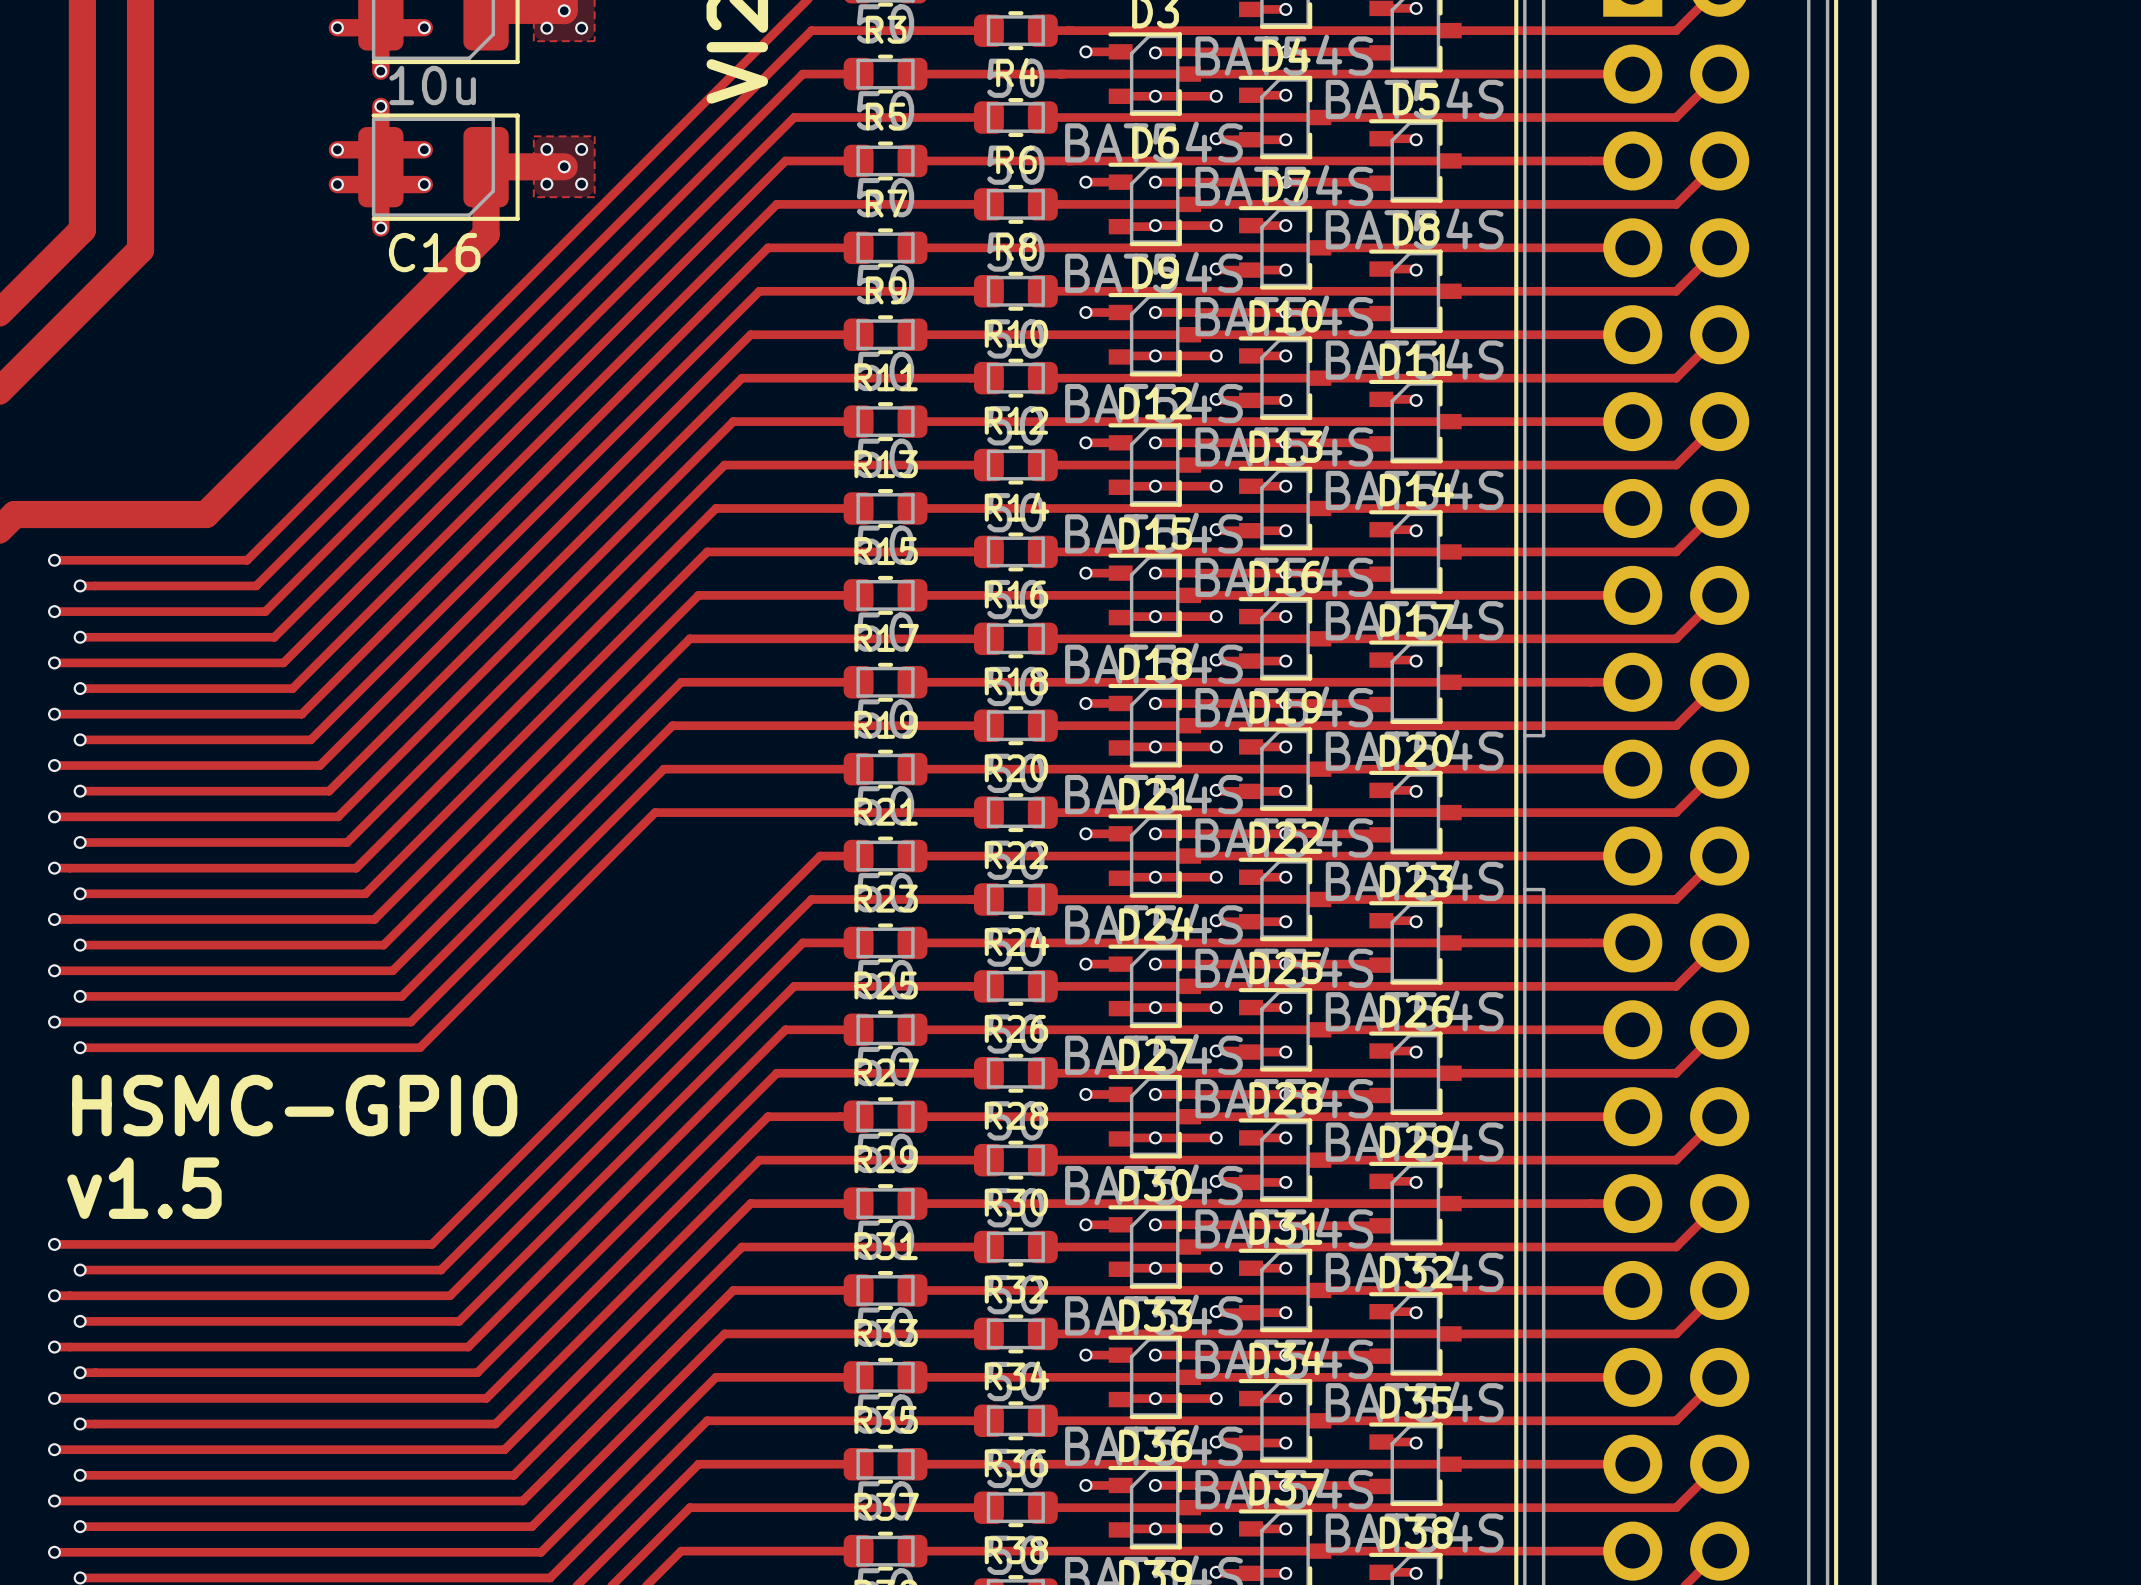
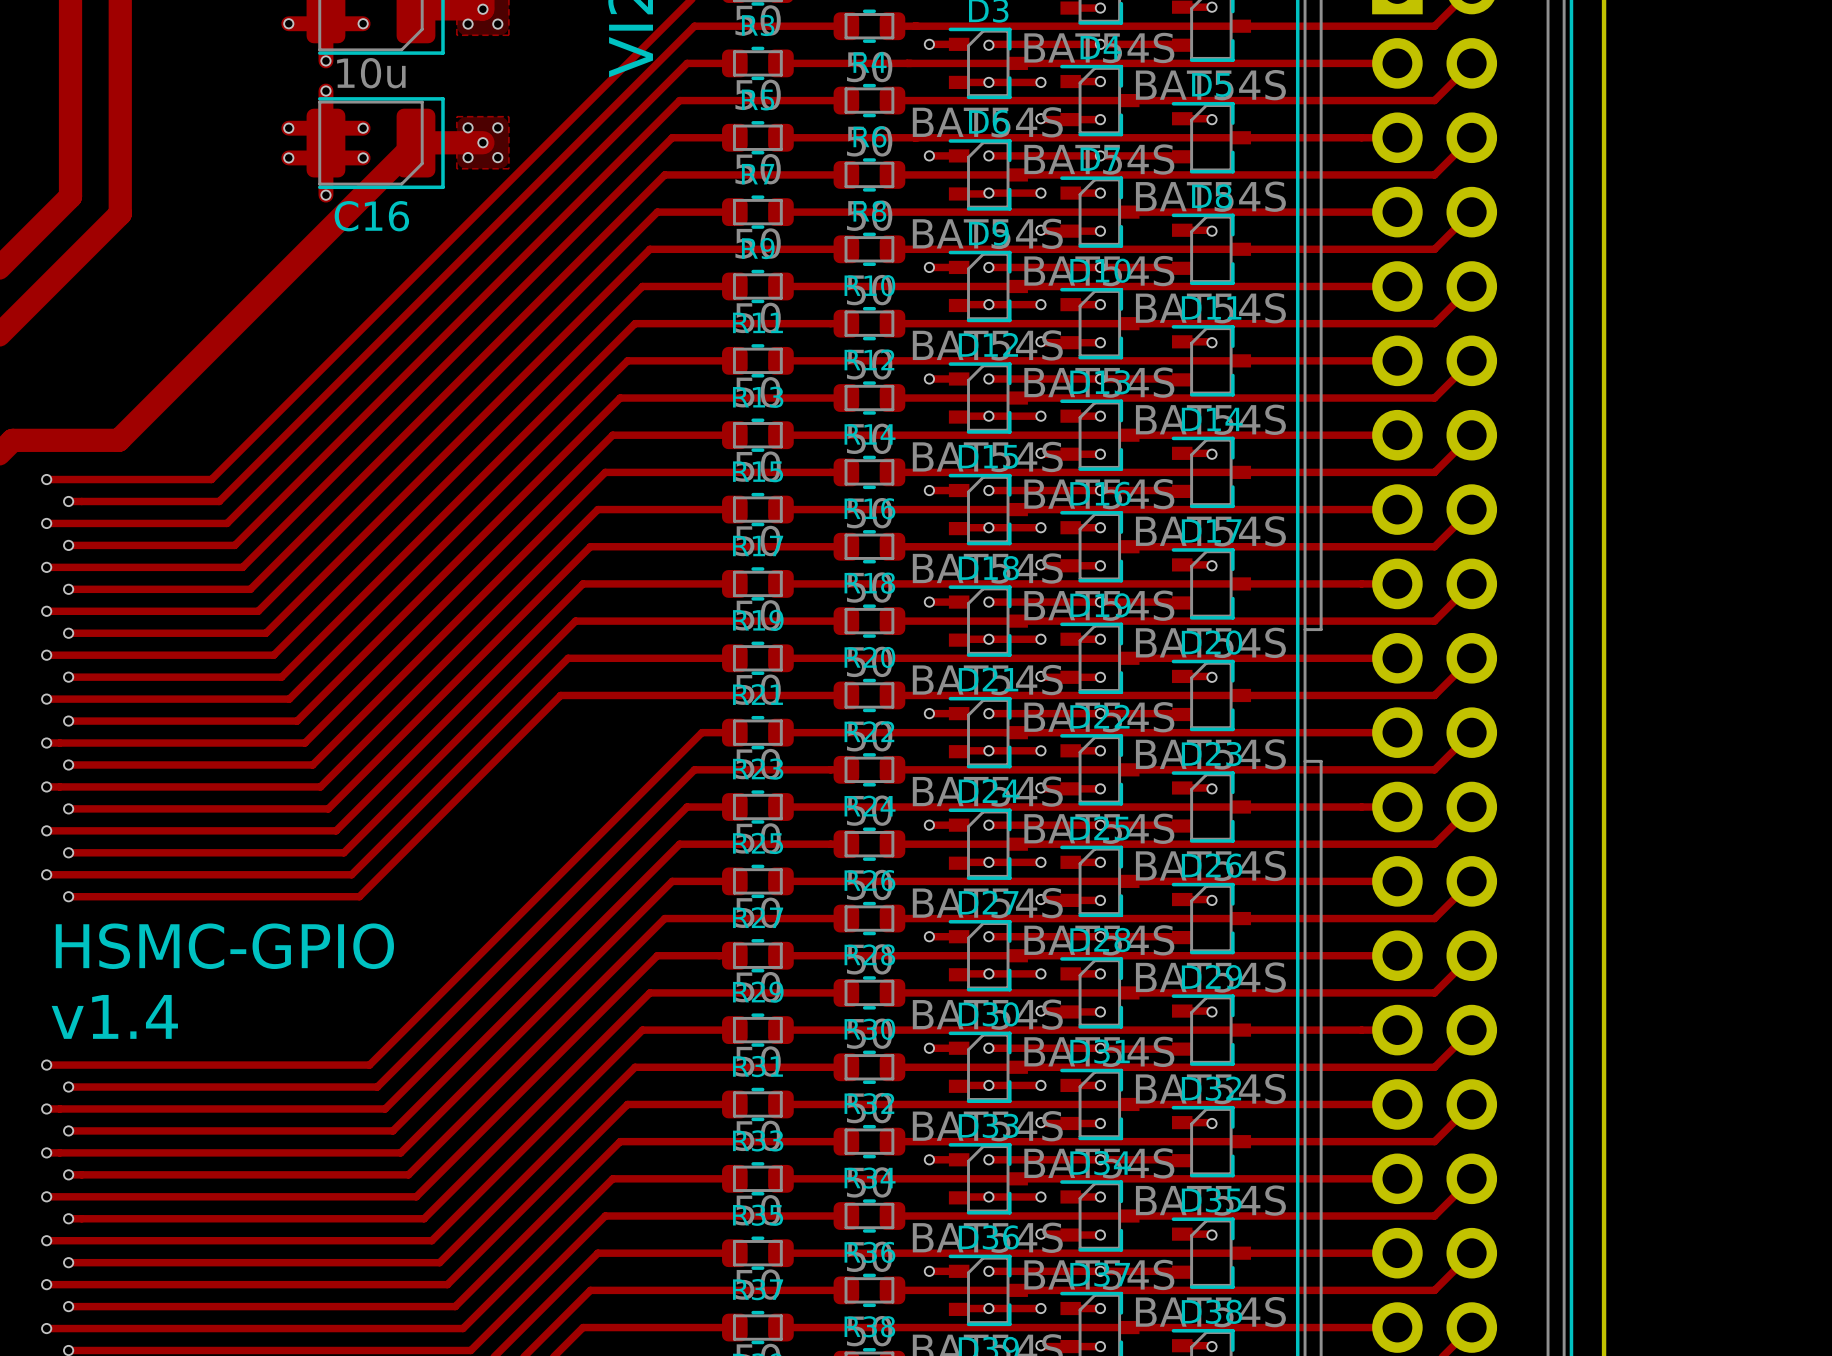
track: (486, 167) (486, 234) (205, 514) (138, 514) -> (415, 143) (118, 440)
text: v1.5 (144, 1188) -> v1.4 (114, 1016)

